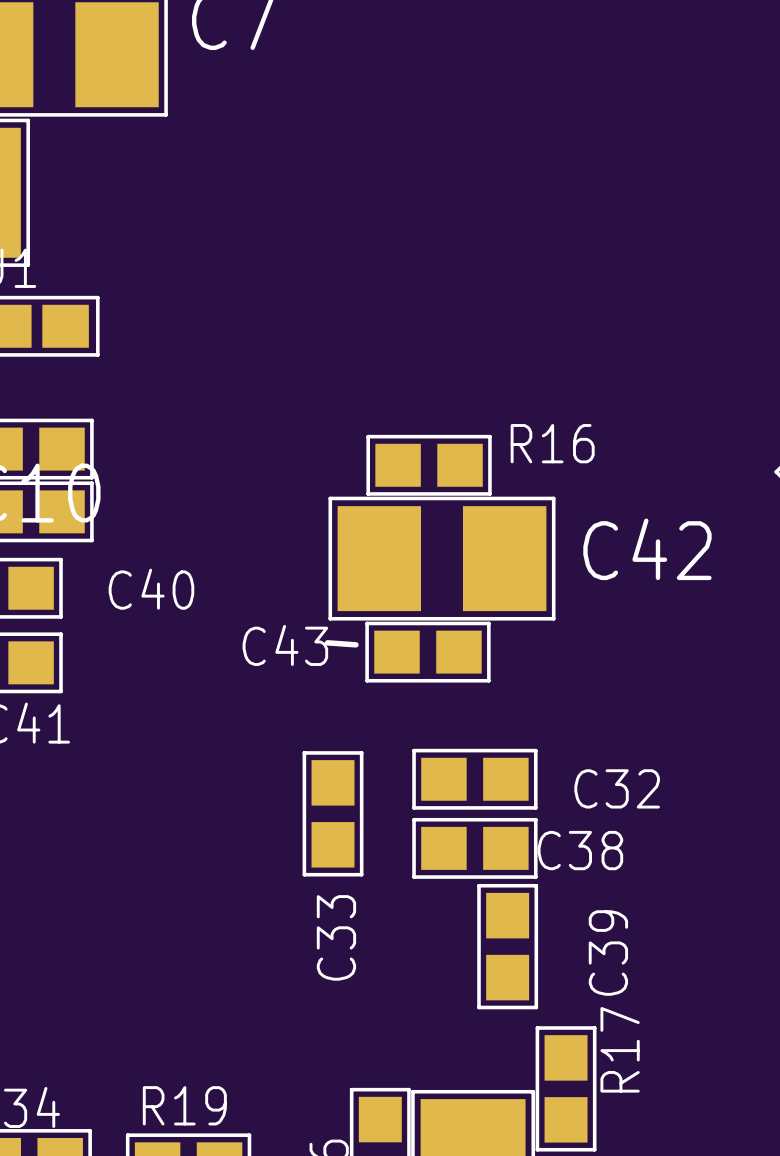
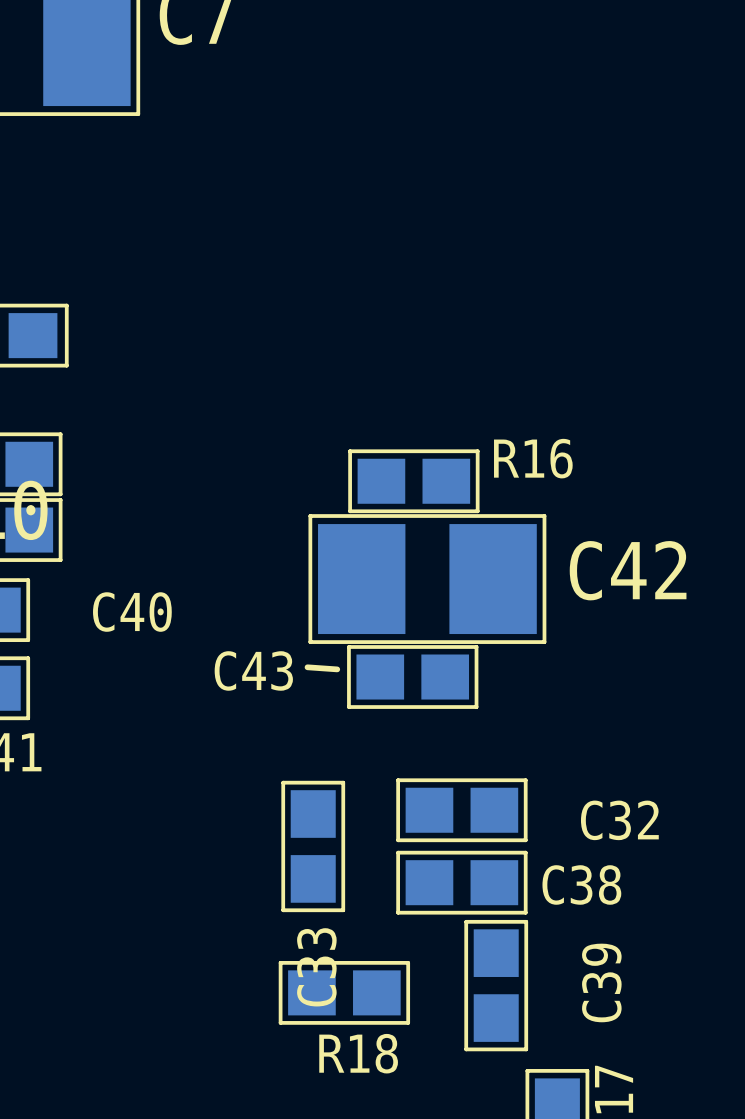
R18: none -> (344, 992)

